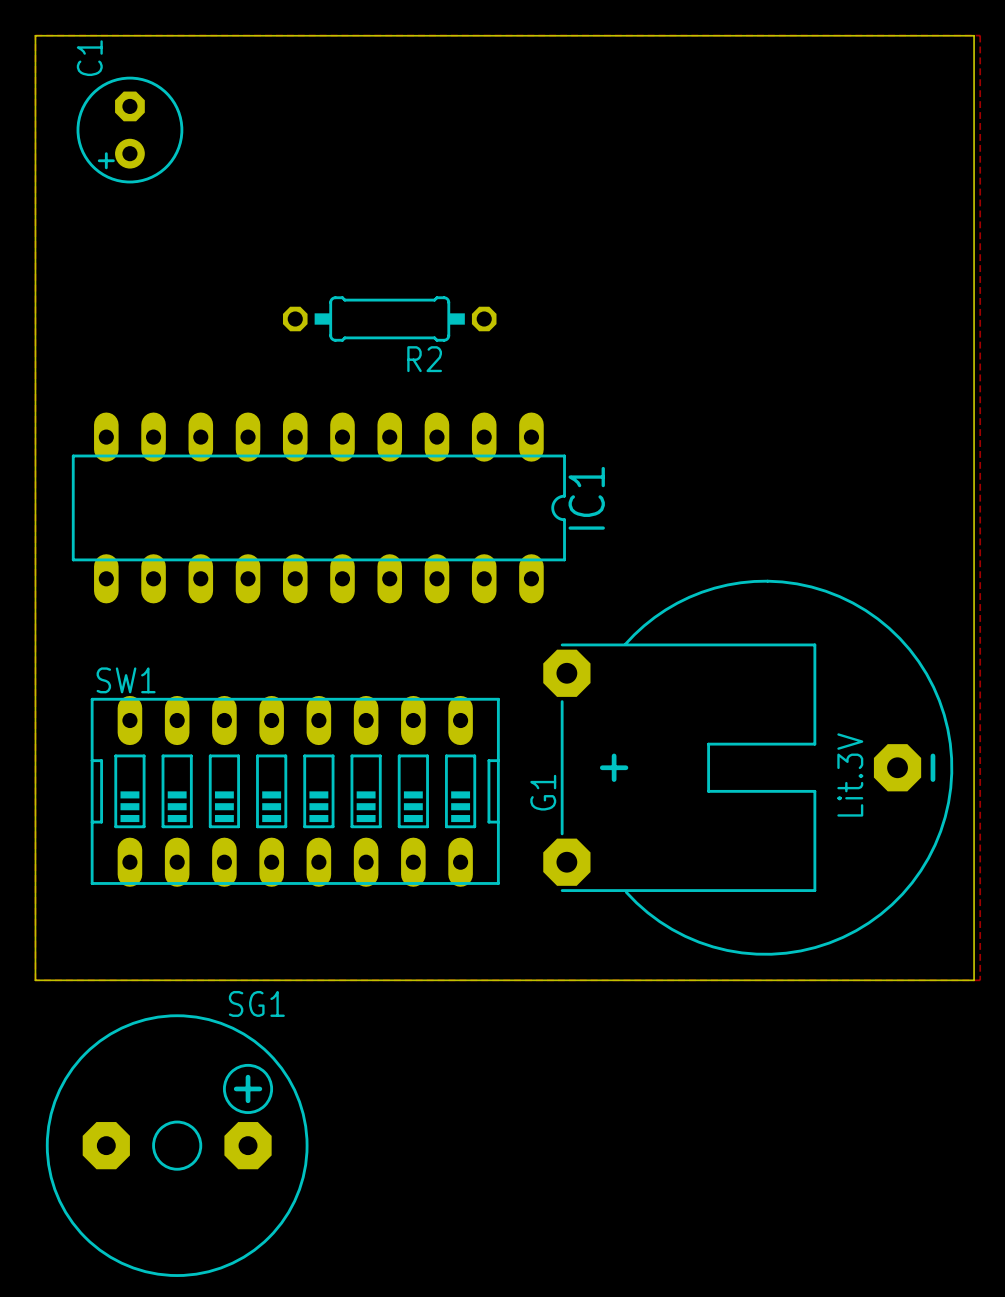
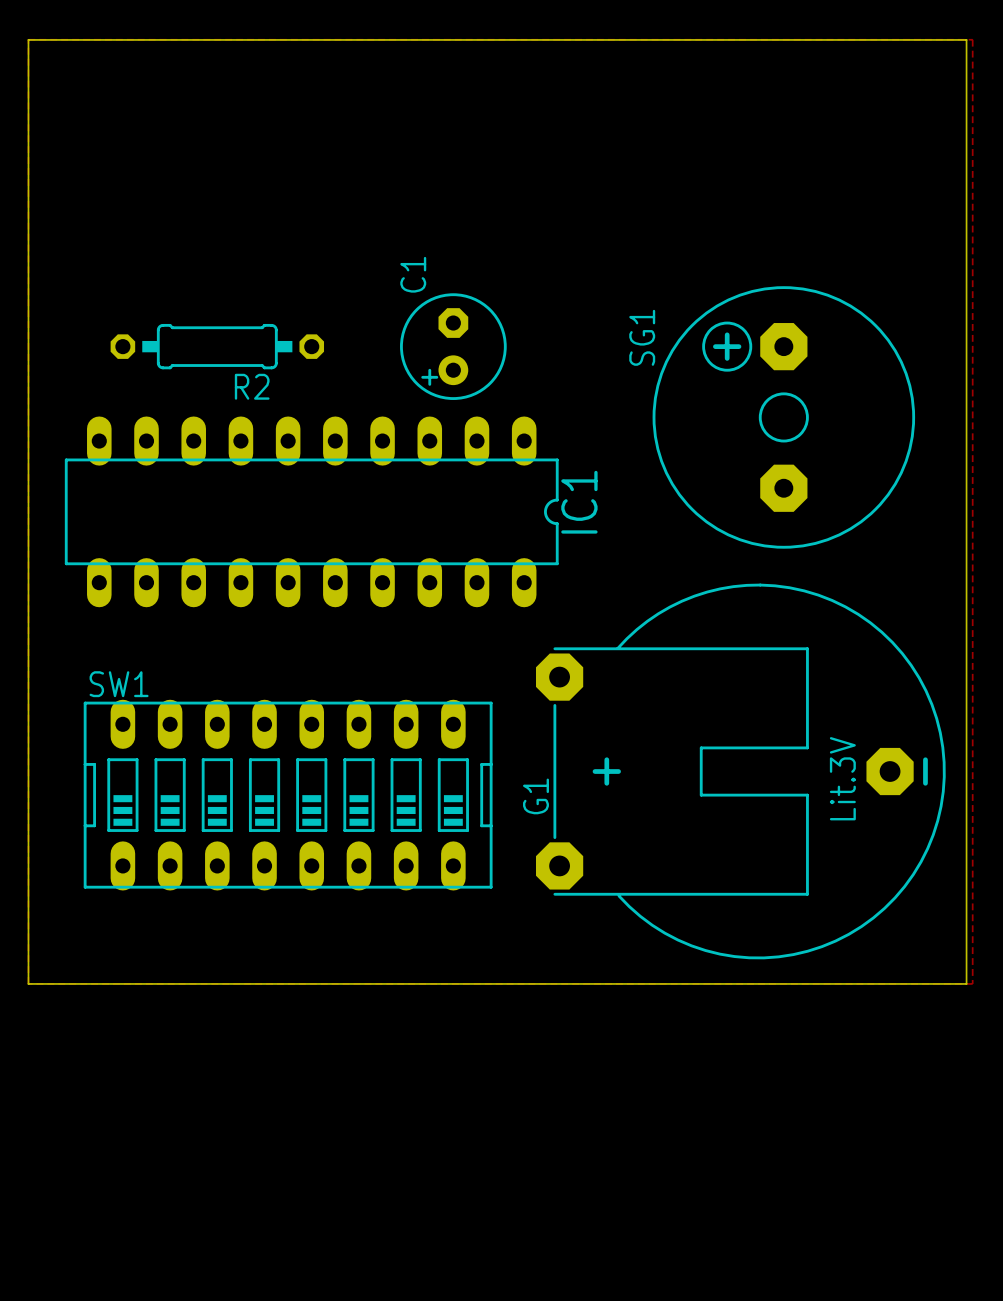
C1 position: (129, 130) -> (453, 346)
R2 position: (389, 319) -> (217, 346)
SG1 rotation: 0° (177, 1145) -> 90° counterclockwise (783, 417)
SG1 position: (177, 1145) -> (783, 417)

